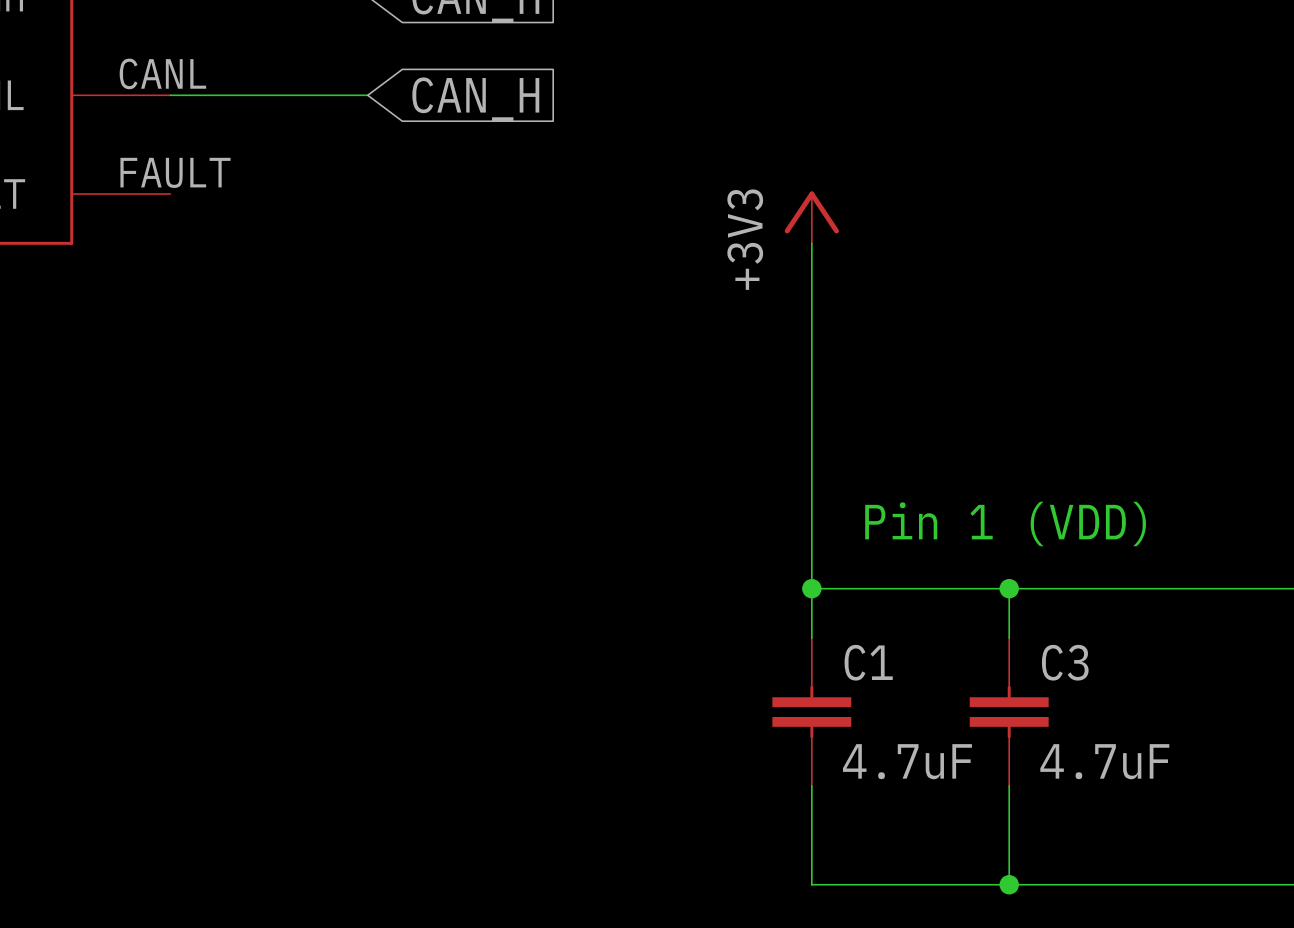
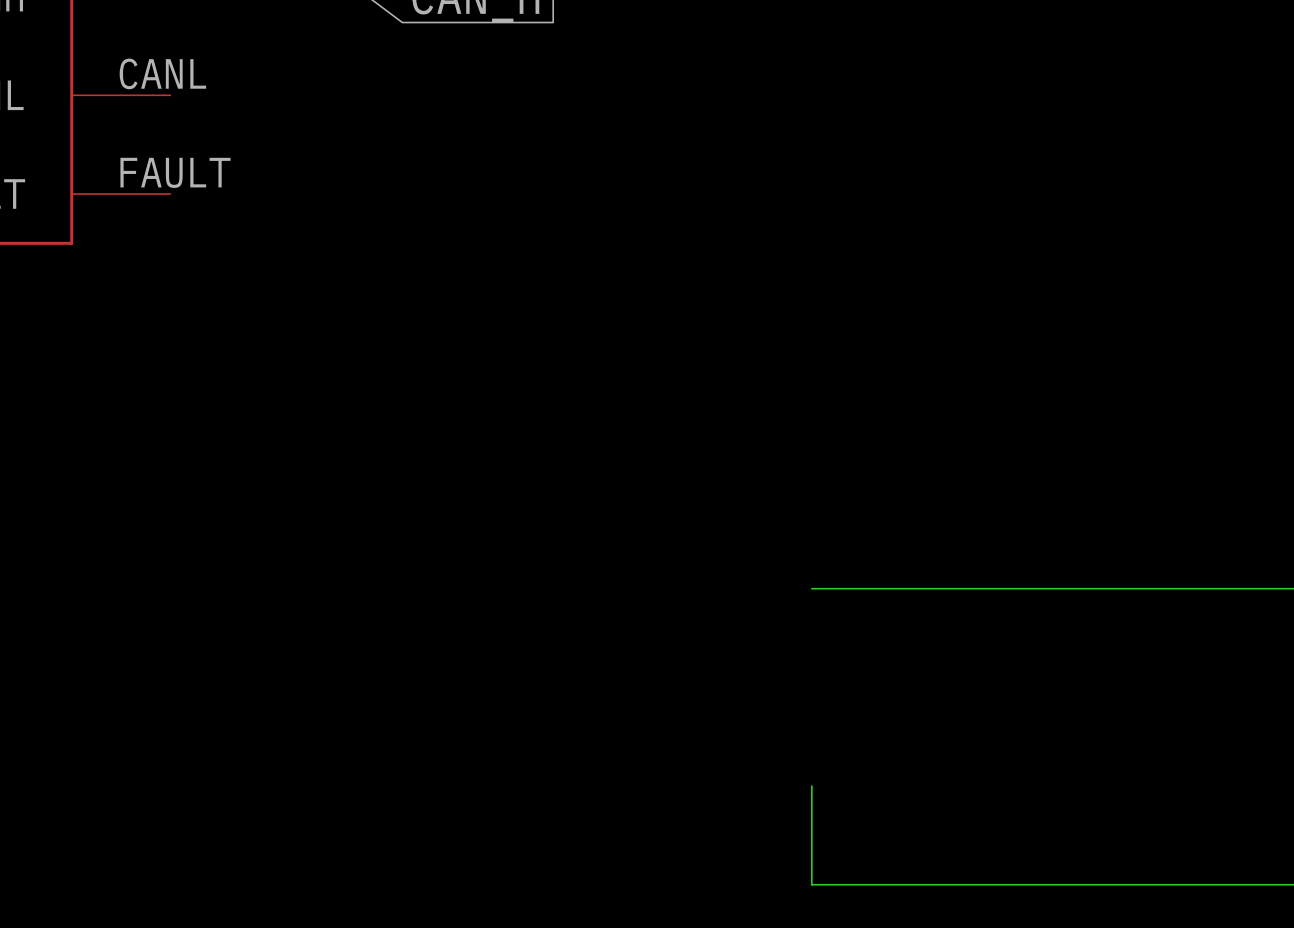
wire: (170, 95) (367, 95) -> none
global label: CAN_H (475, 99) -> none
power symbol: +3V3 (811, 217) -> none
wire: (811, 243) (811, 638) -> none
text: Pin 1 (VDD) (1005, 523) -> none
junction: (811, 588) -> none
wire: (1009, 588) (1009, 638) -> none
junction: (1009, 588) -> none
C1: 4.7uF (811, 712) -> none
C3: 4.7uF (1009, 712) -> none
wire: (1009, 786) (1009, 884) -> none
junction: (1009, 884) -> none

